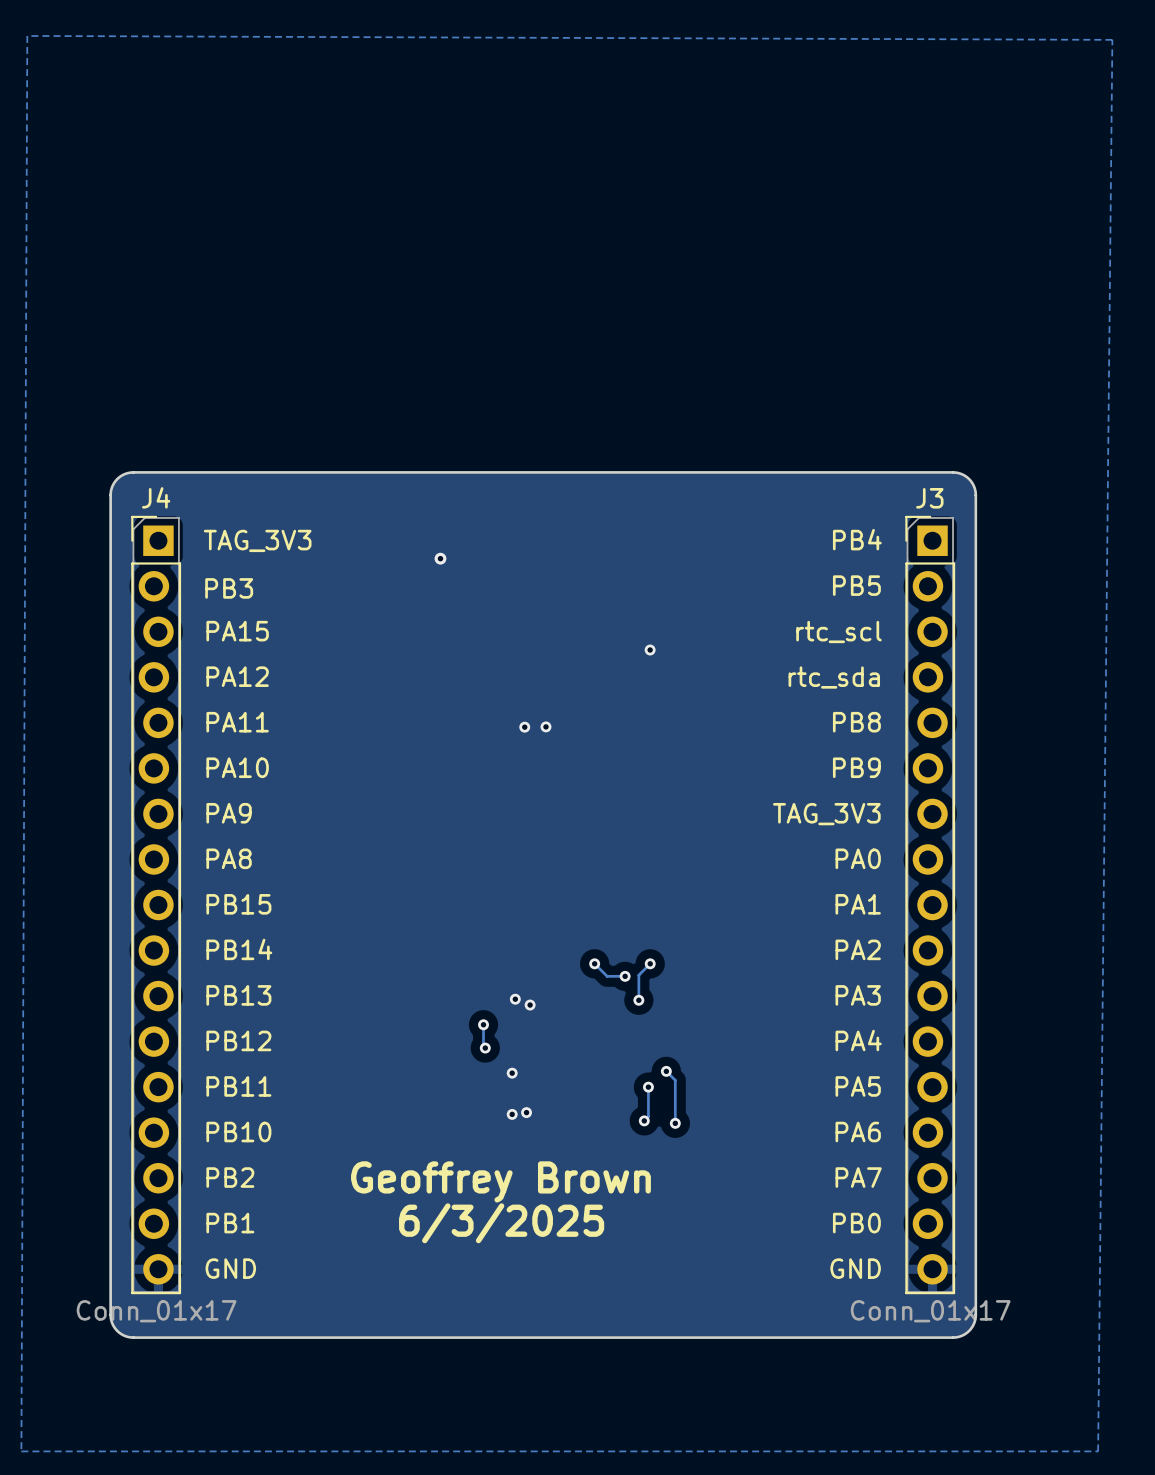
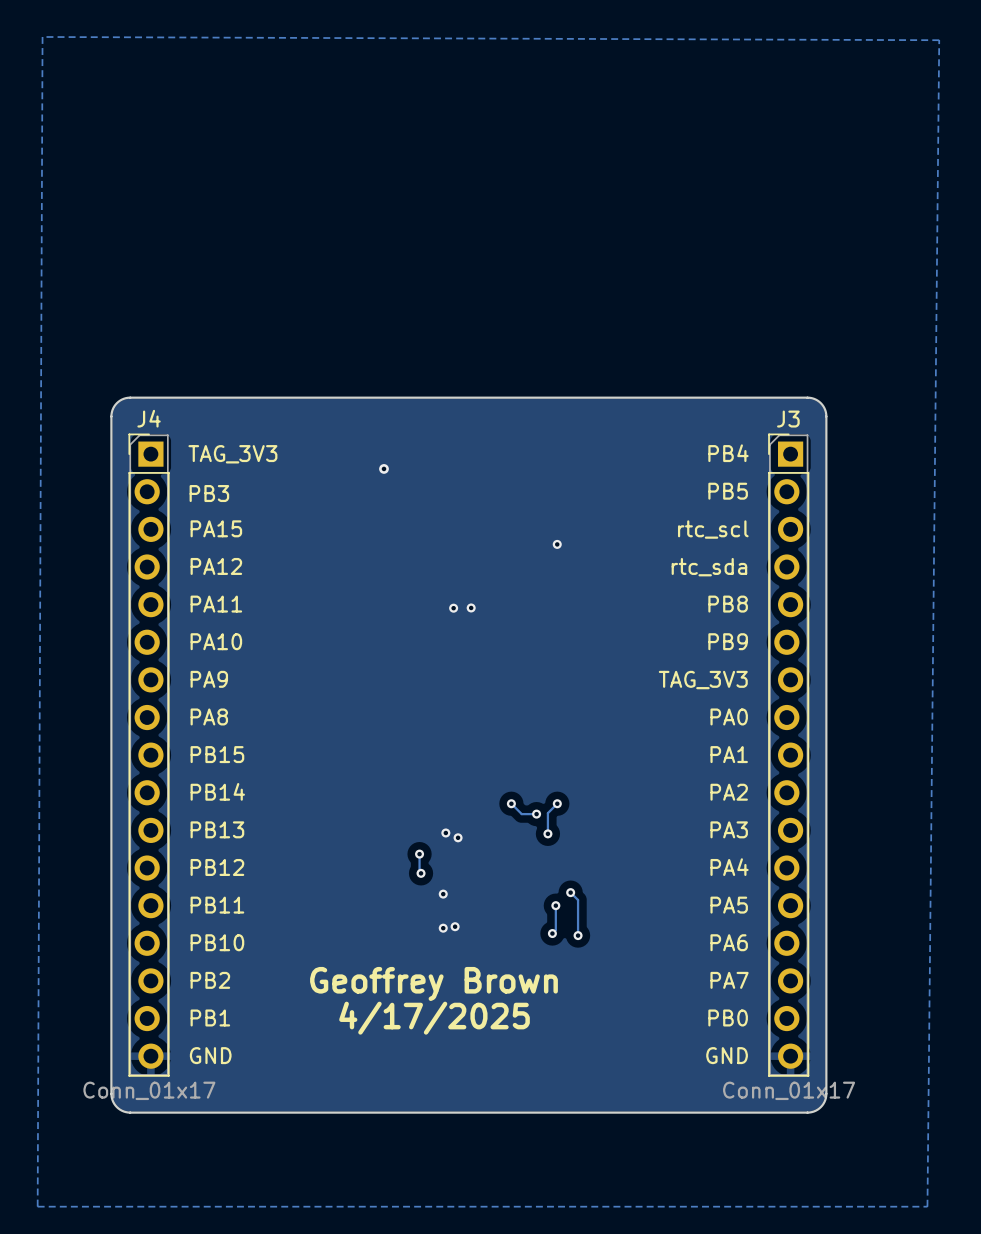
text: 6/3/2025 (501, 1223) -> 4/17/2025 (434, 1018)

